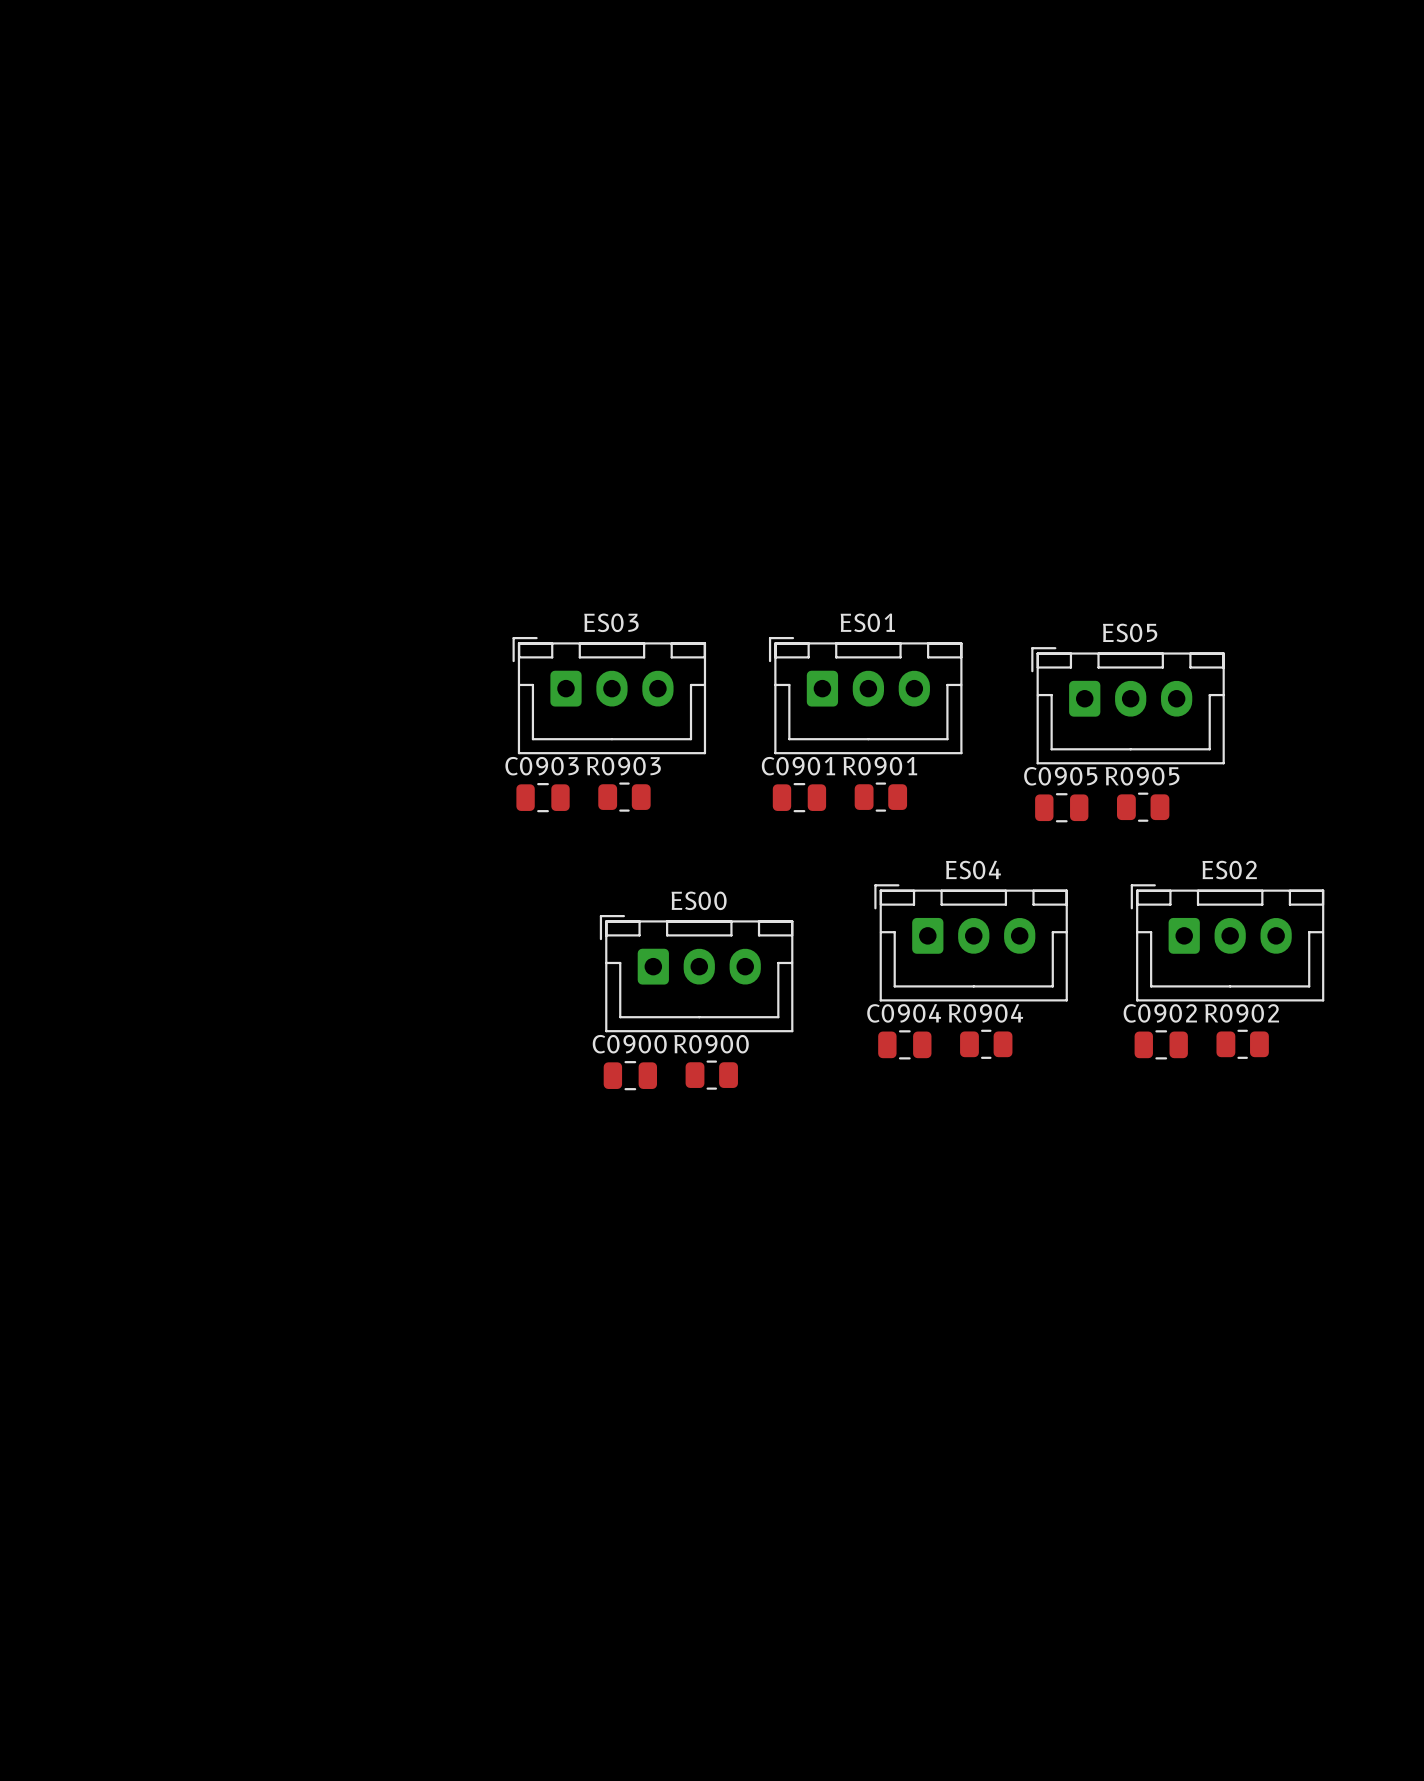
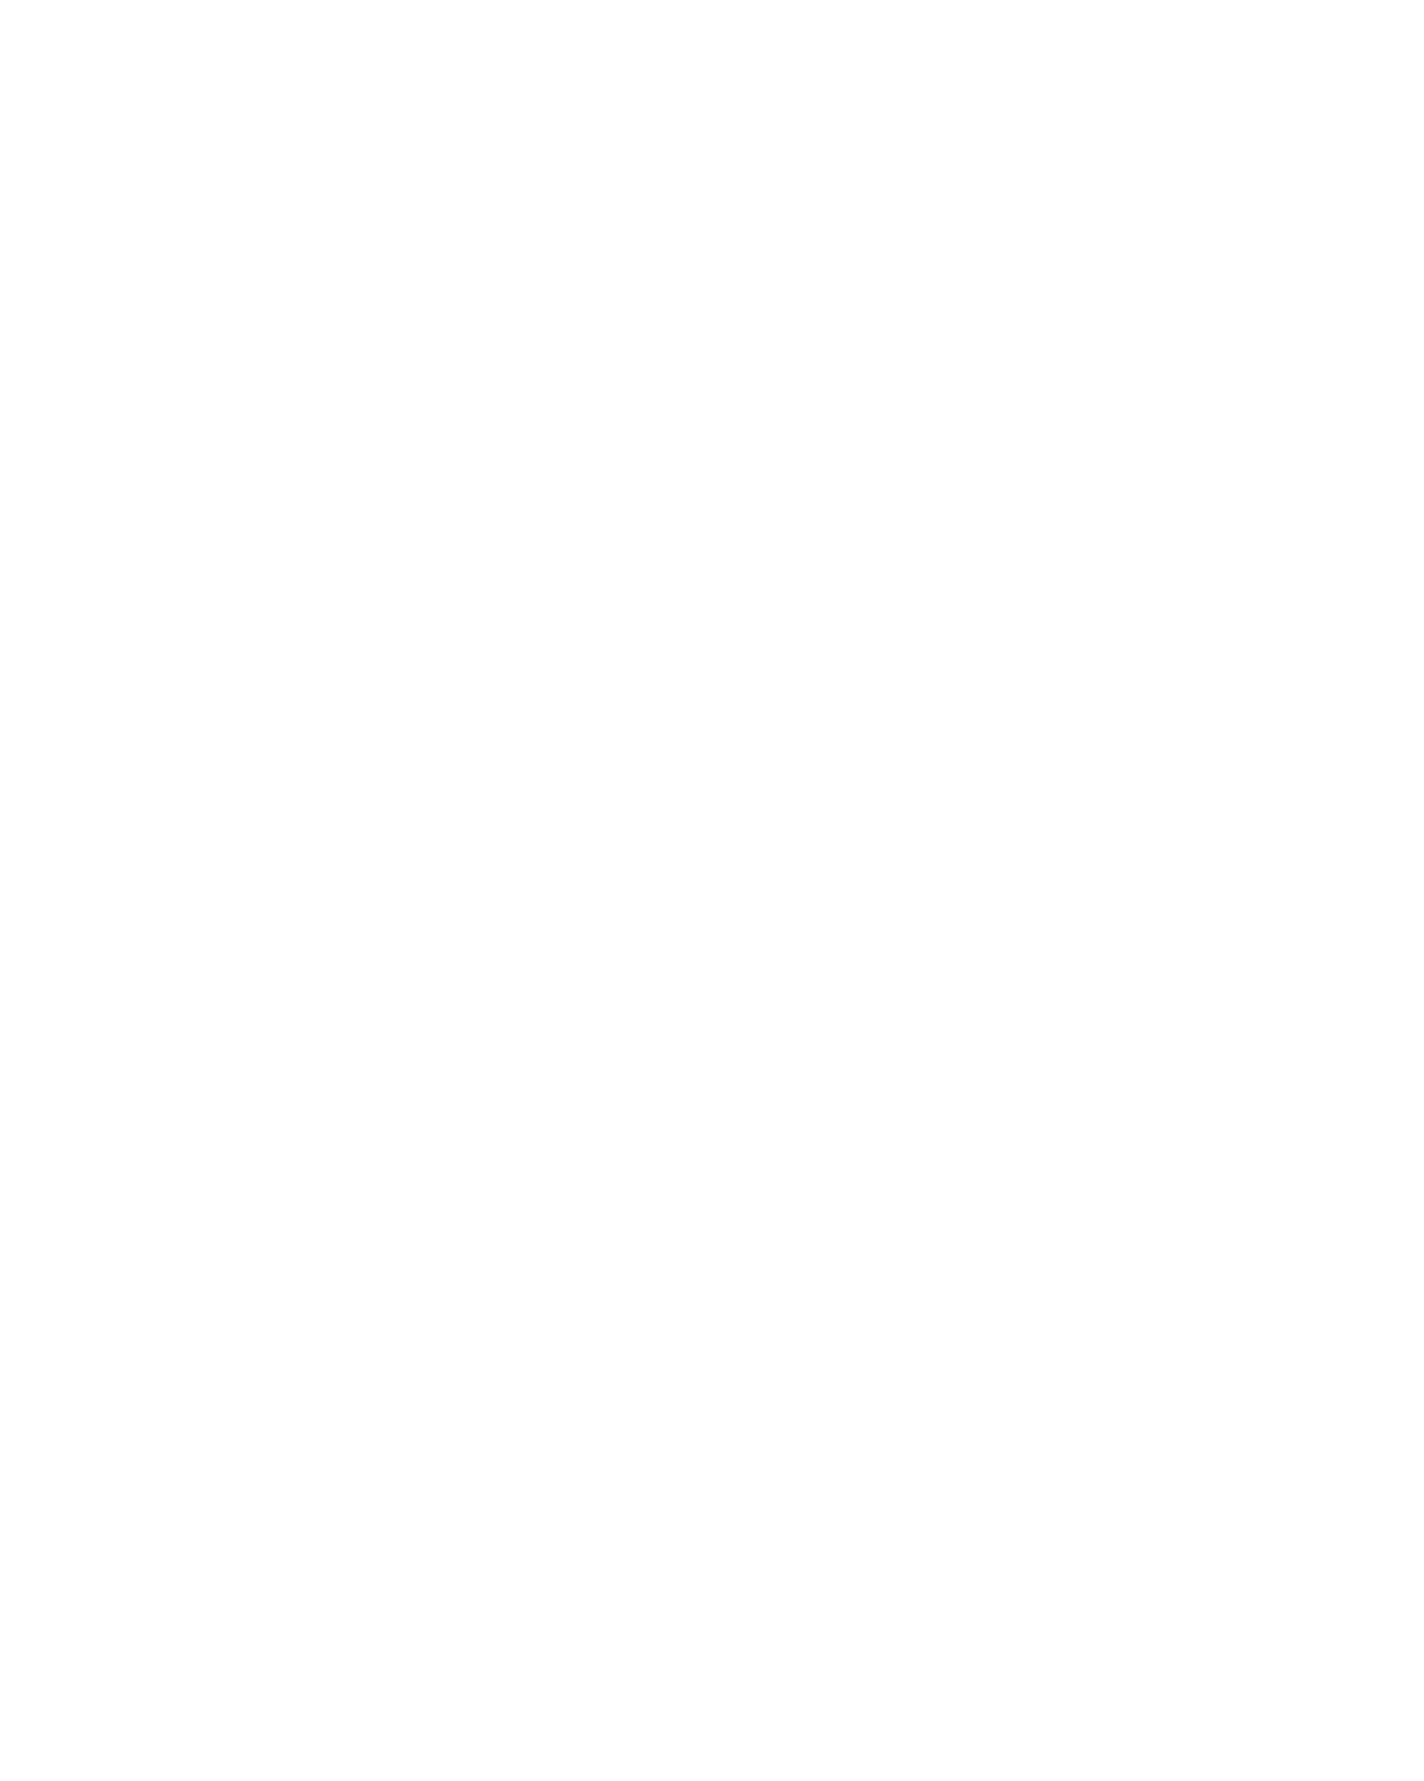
ES03: (609, 695) -> none
ES01: (865, 695) -> none
ES05: (1128, 705) -> none
C0903: (543, 797) -> none
R0903: (624, 797) -> none
C0901: (799, 797) -> none
R0901: (880, 797) -> none
C0905: (1061, 807) -> none
R0905: (1143, 807) -> none
ES04: (971, 942) -> none
ES02: (1227, 942) -> none
ES00: (696, 973) -> none
C0904: (904, 1044) -> none
R0904: (986, 1044) -> none
C0902: (1161, 1044) -> none
R0902: (1242, 1044) -> none
C0900: (630, 1075) -> none
R0900: (711, 1075) -> none

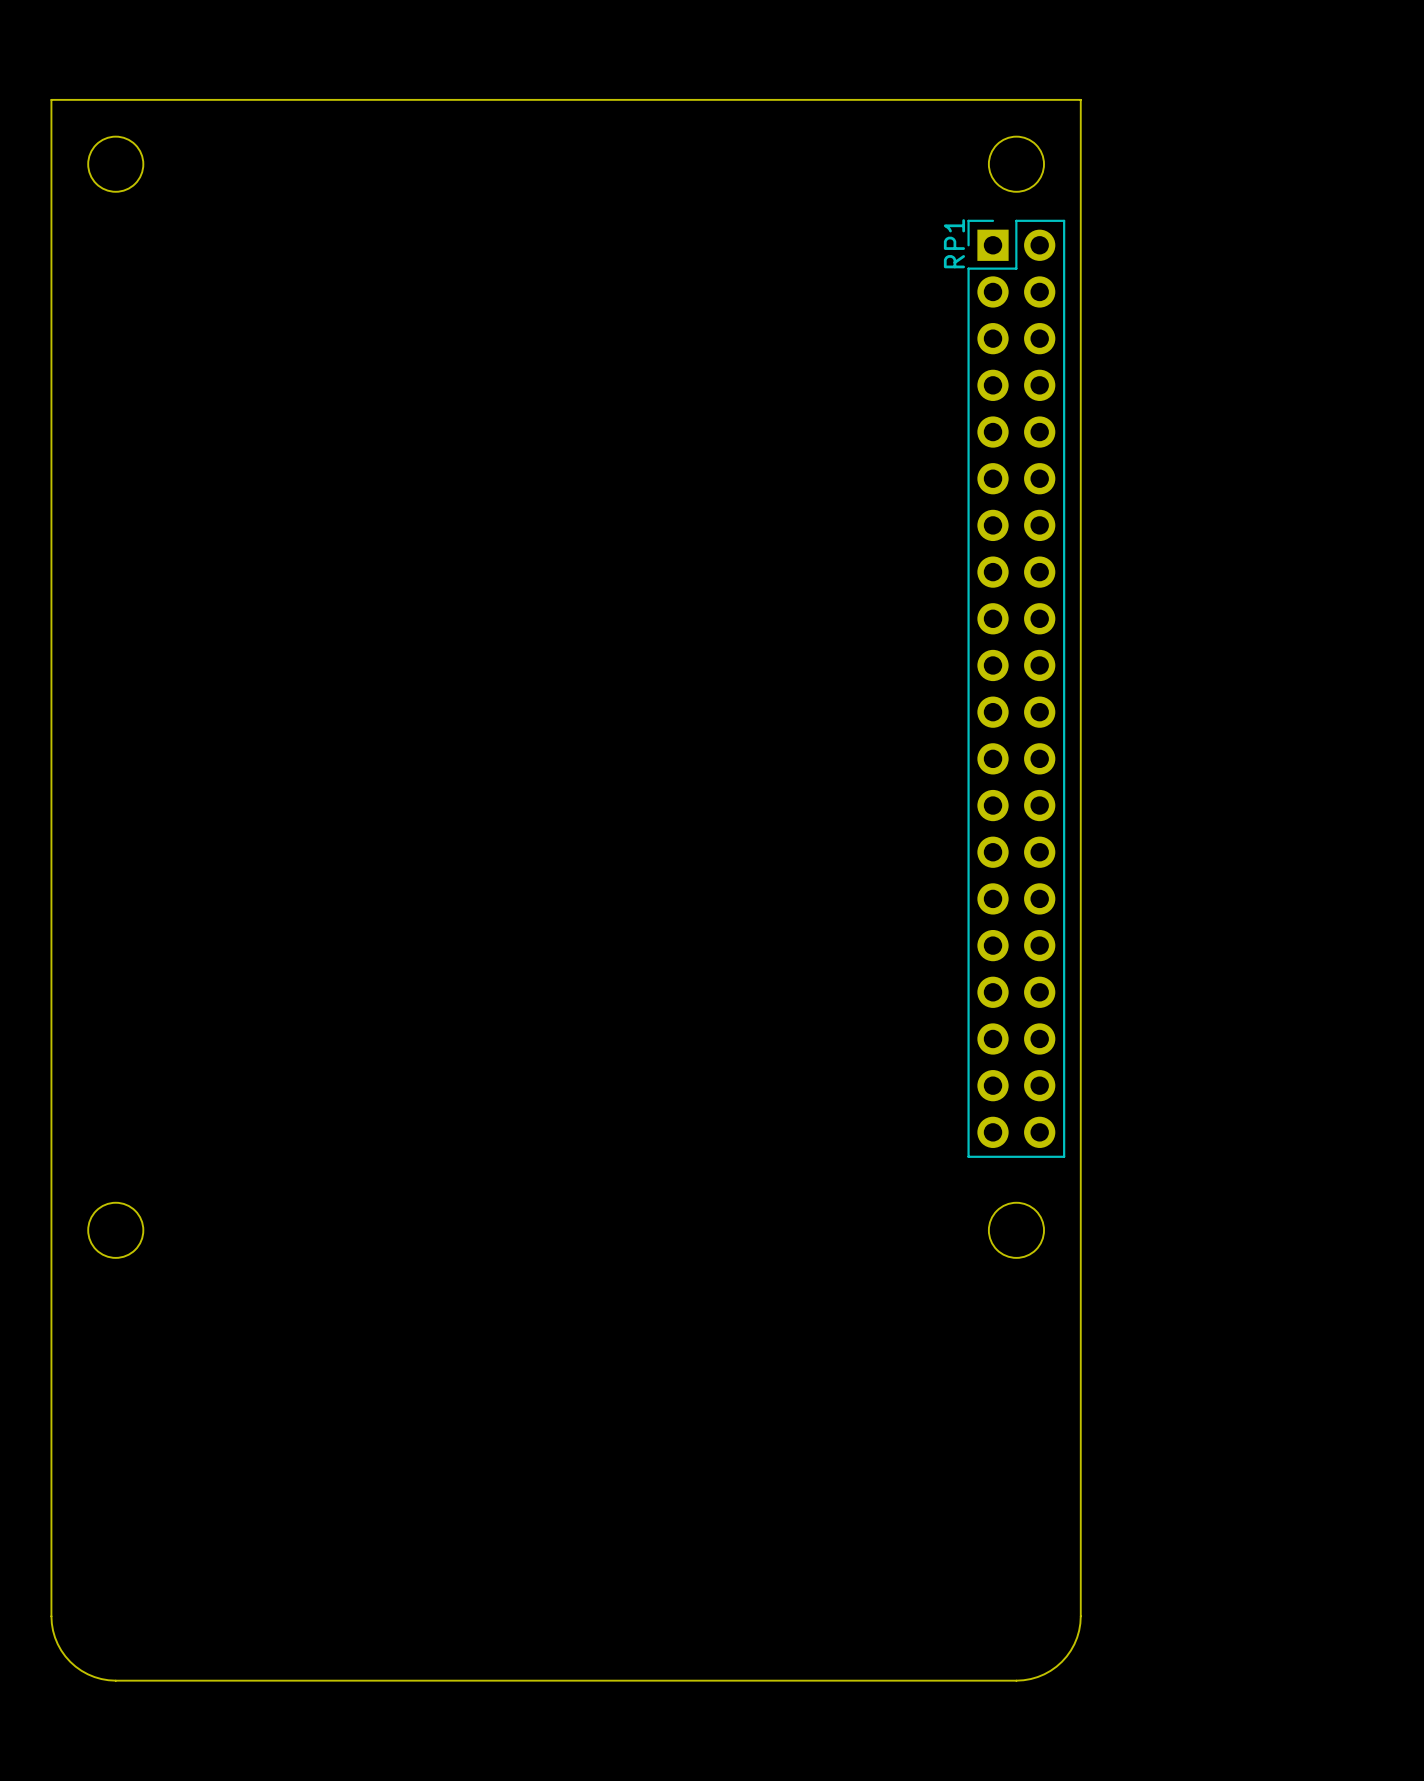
board edge: none -> (51, 99) (1080, 99) (1080, 1616) (1079, 1630) (1074, 1644) (1066, 1656) (1050, 1670) (1037, 1677) (1016, 1680) (115, 1680) (101, 1679) (81, 1670) (70, 1661) (61, 1650) (55, 1637) (51, 1616) (51, 99)
round board edge: none -> [87, 136, 144, 193]
round board edge: none -> [988, 136, 1045, 193]
RP1: none -> (1016, 688)
round board edge: none -> [87, 1202, 144, 1259]
round board edge: none -> [988, 1202, 1045, 1259]

